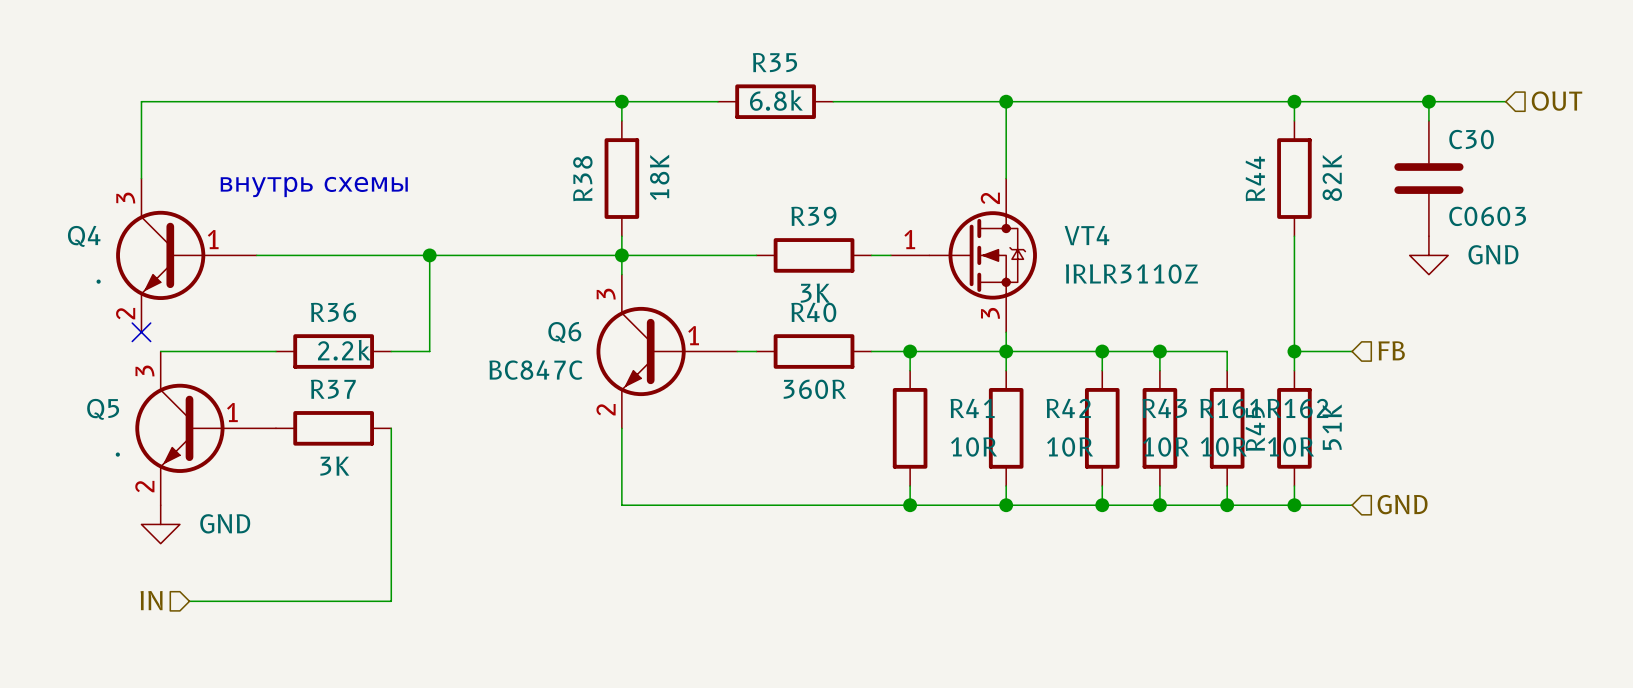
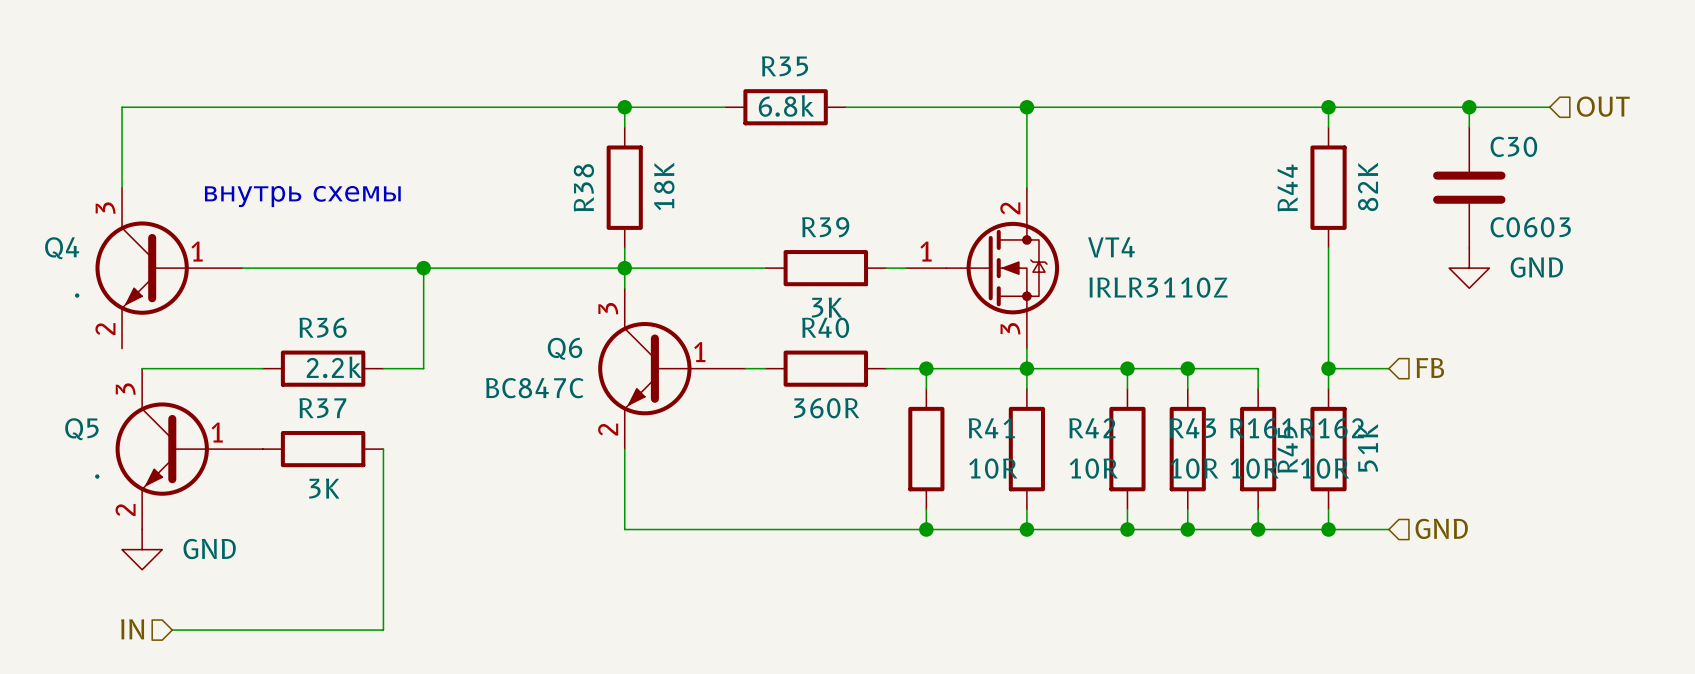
no-connect mark: (141, 332) -> none

